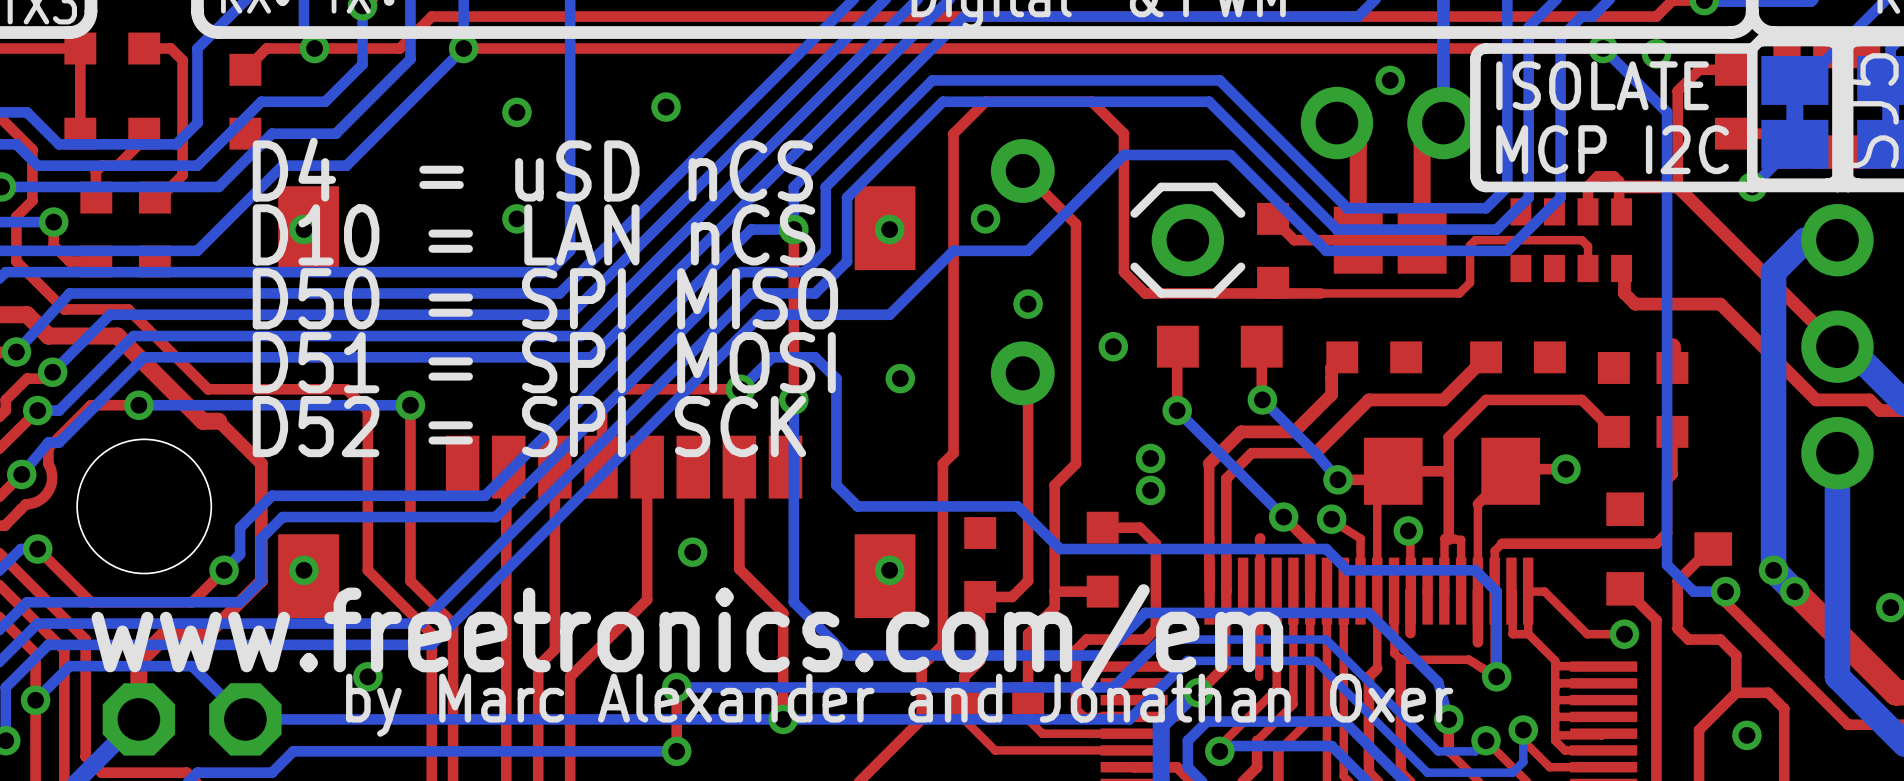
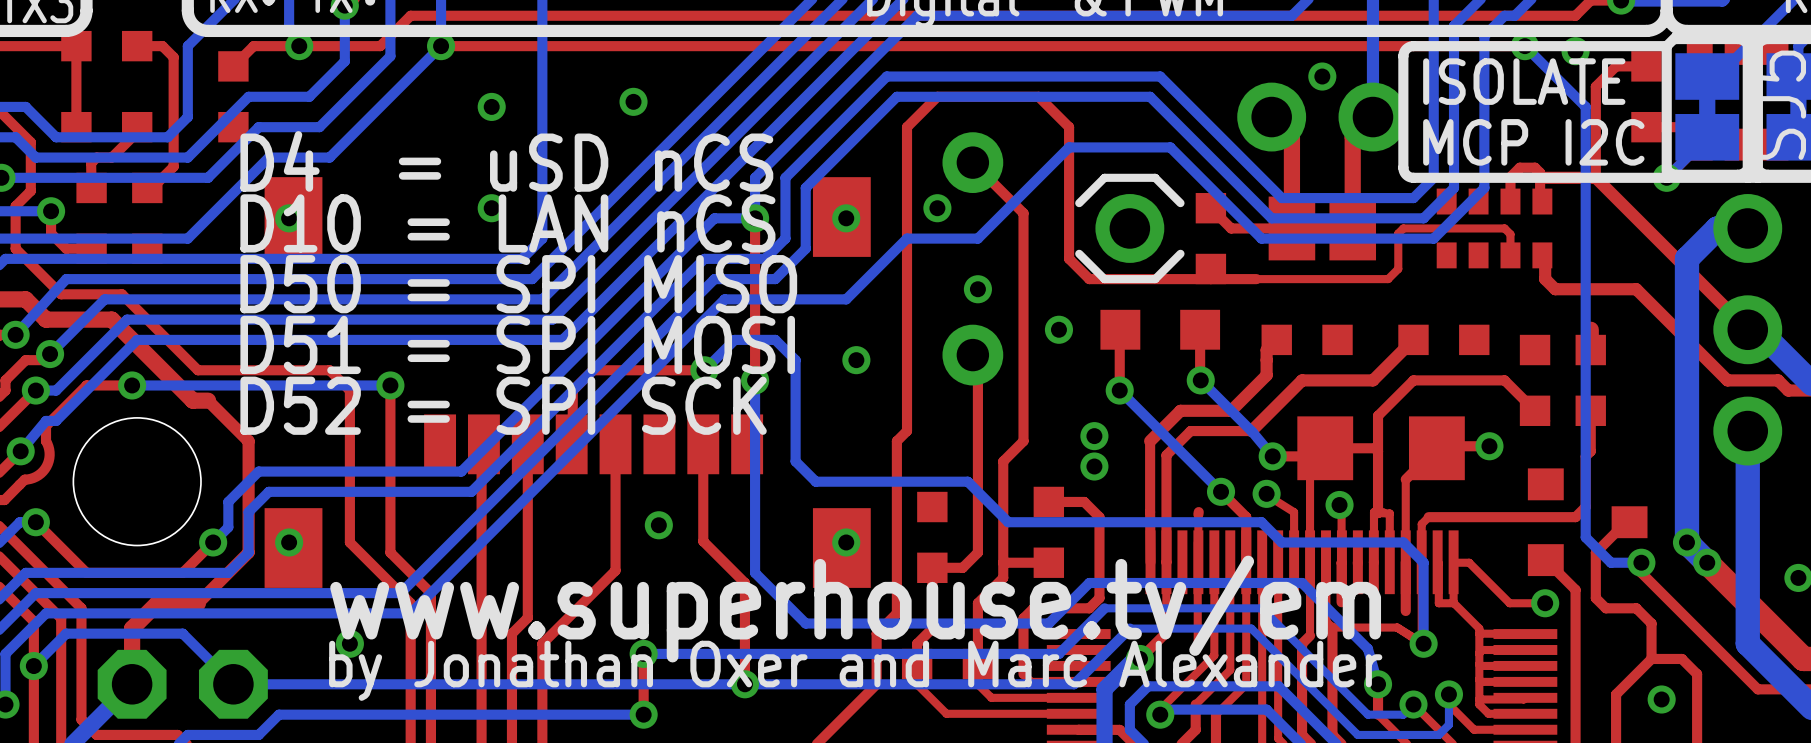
text: www.freetronics.com/em (687, 636) -> none
text: none -> www.superhouse.tv/em (855, 609)
text: by Marc Alexander and Jonathan Oxer (899, 705) -> by Jonathan Oxer and Marc Alexander (855, 670)

